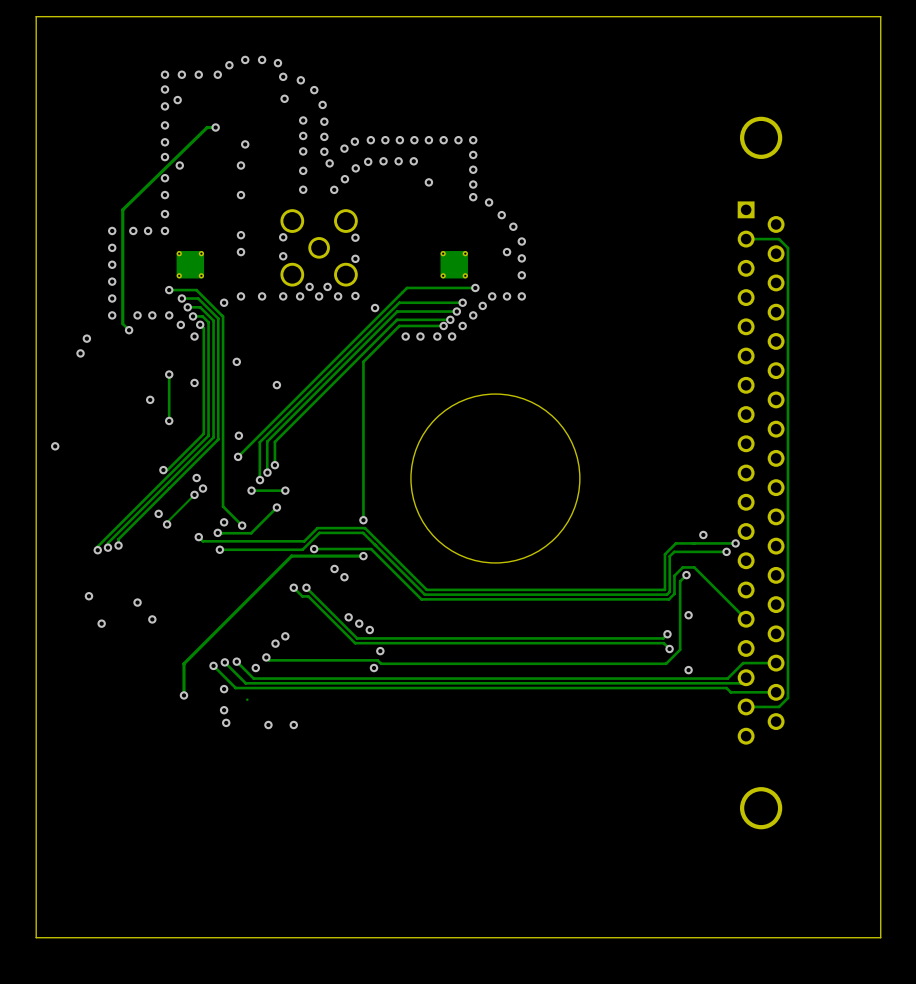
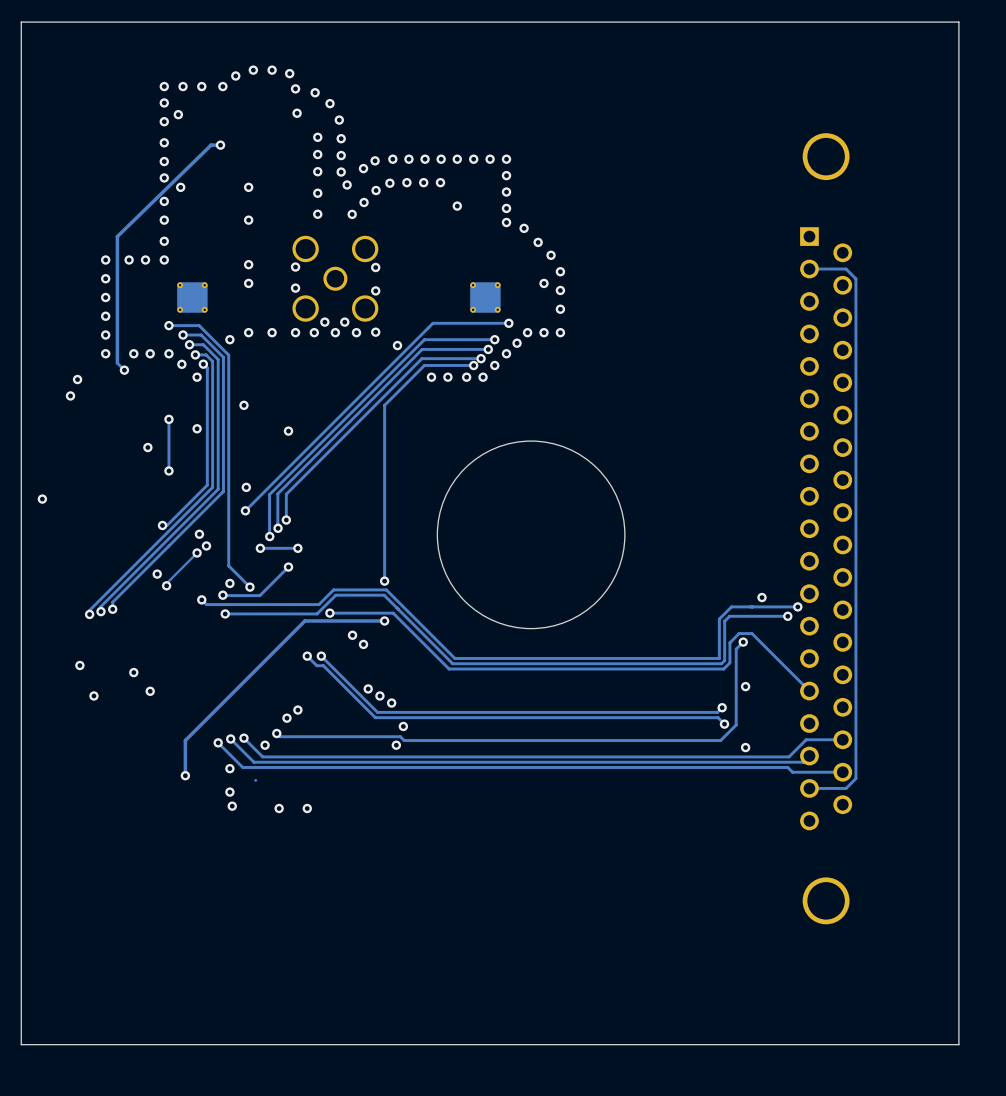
via: (245, 144) -> none

